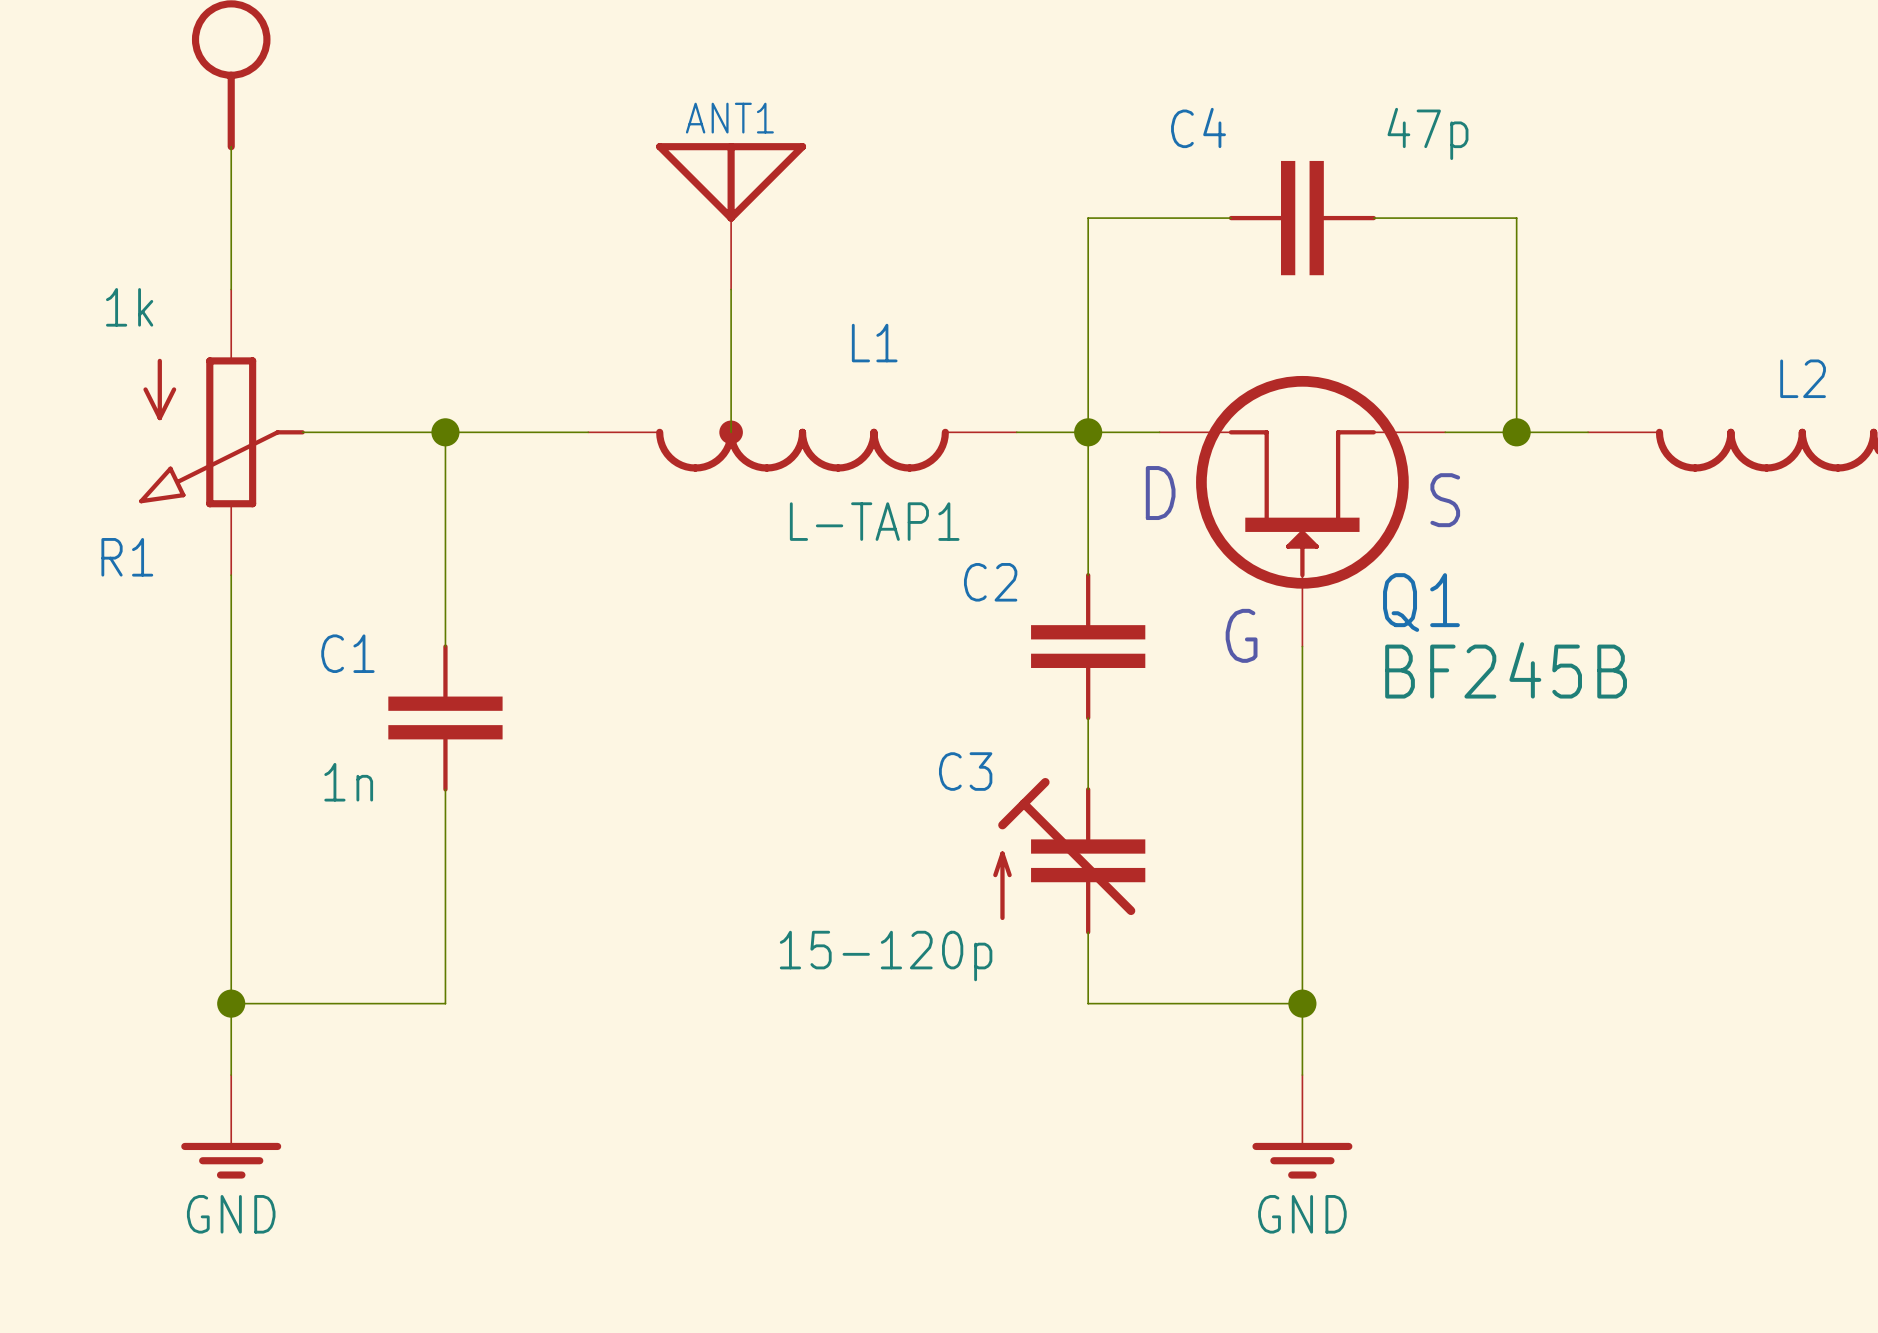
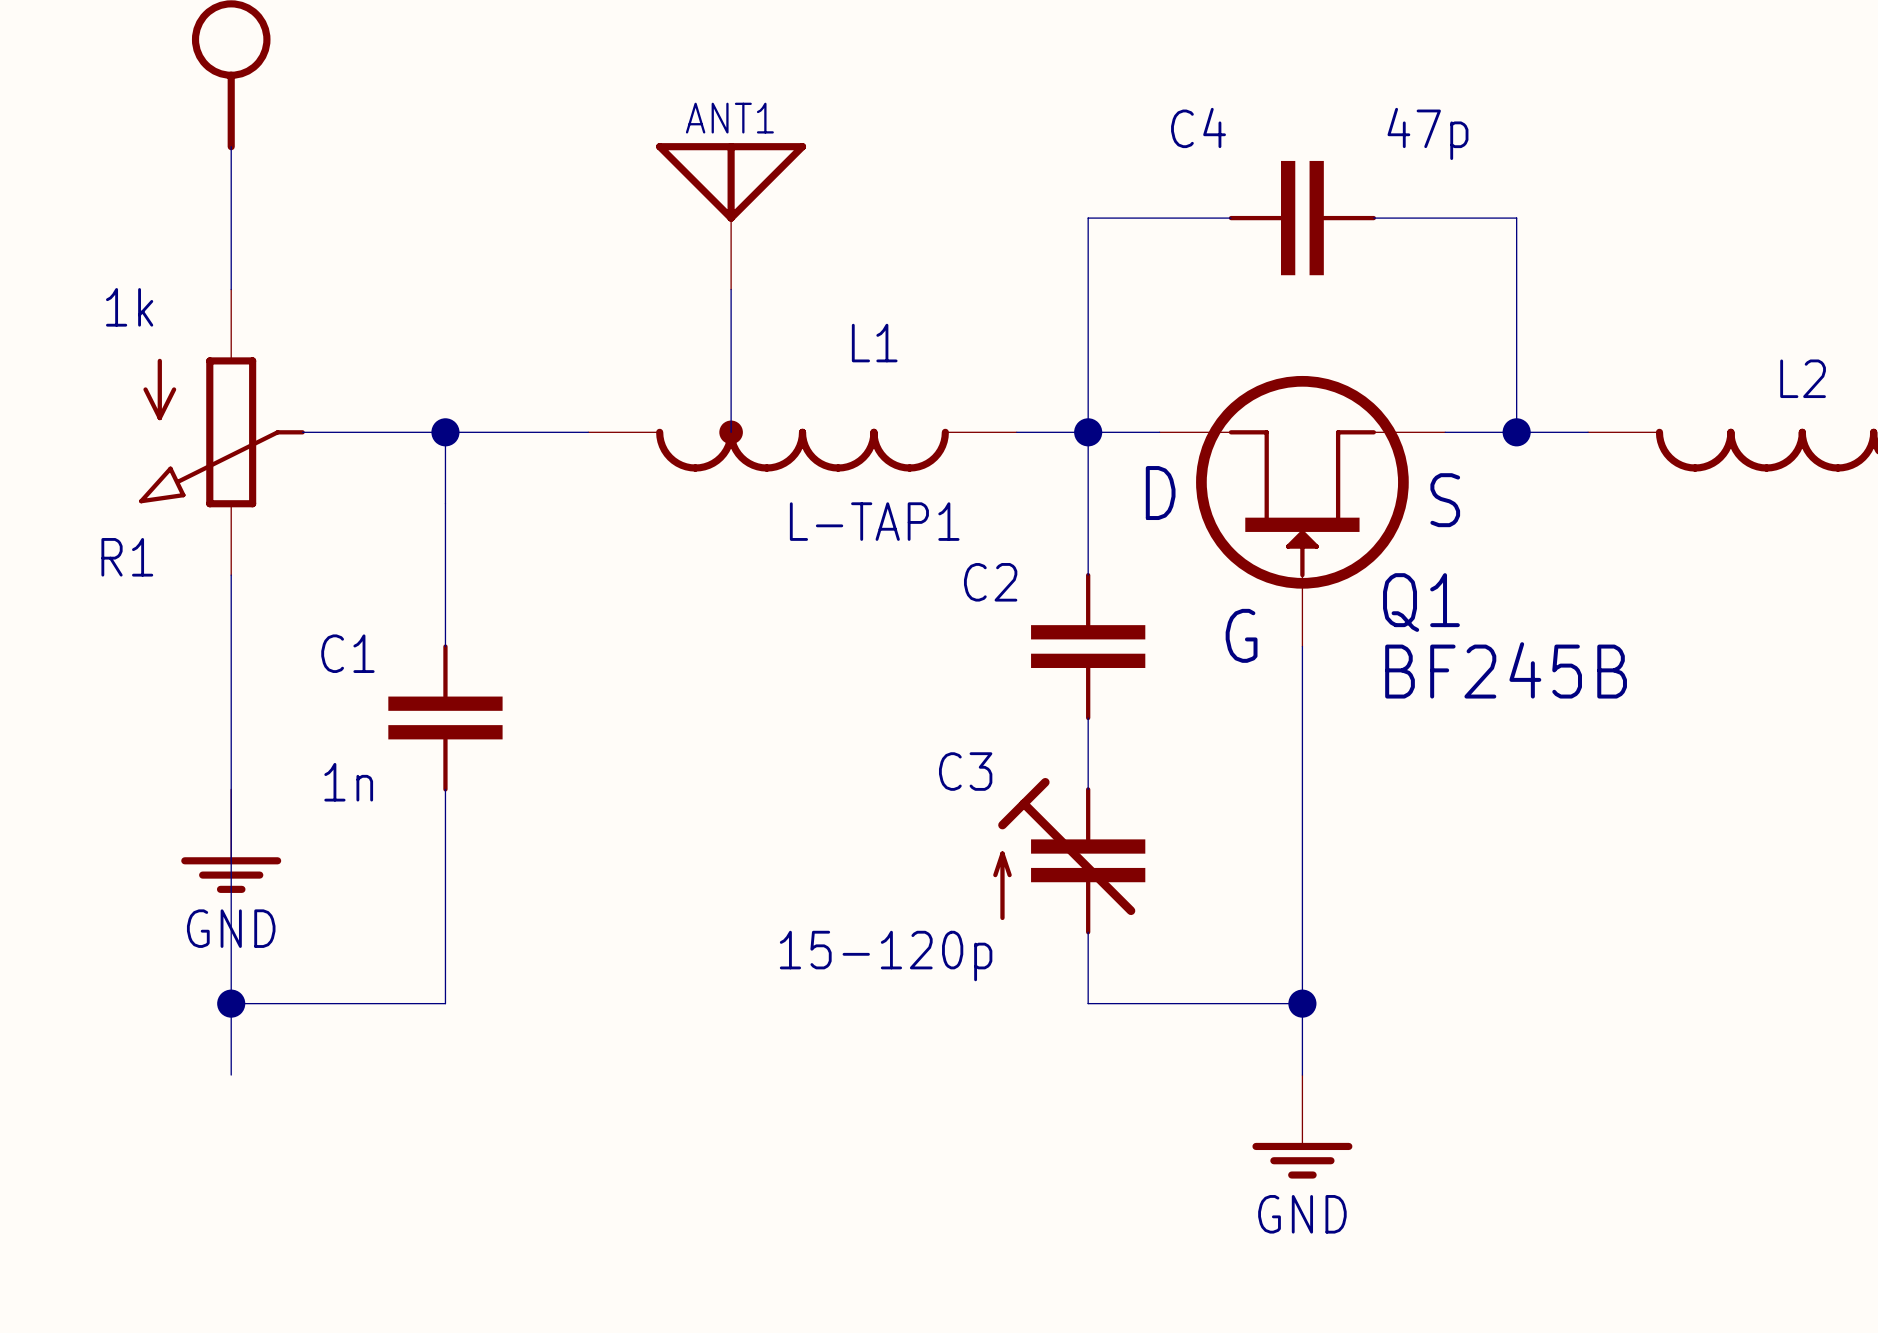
power symbol position: GND (231, 1126) -> GND (231, 841)

